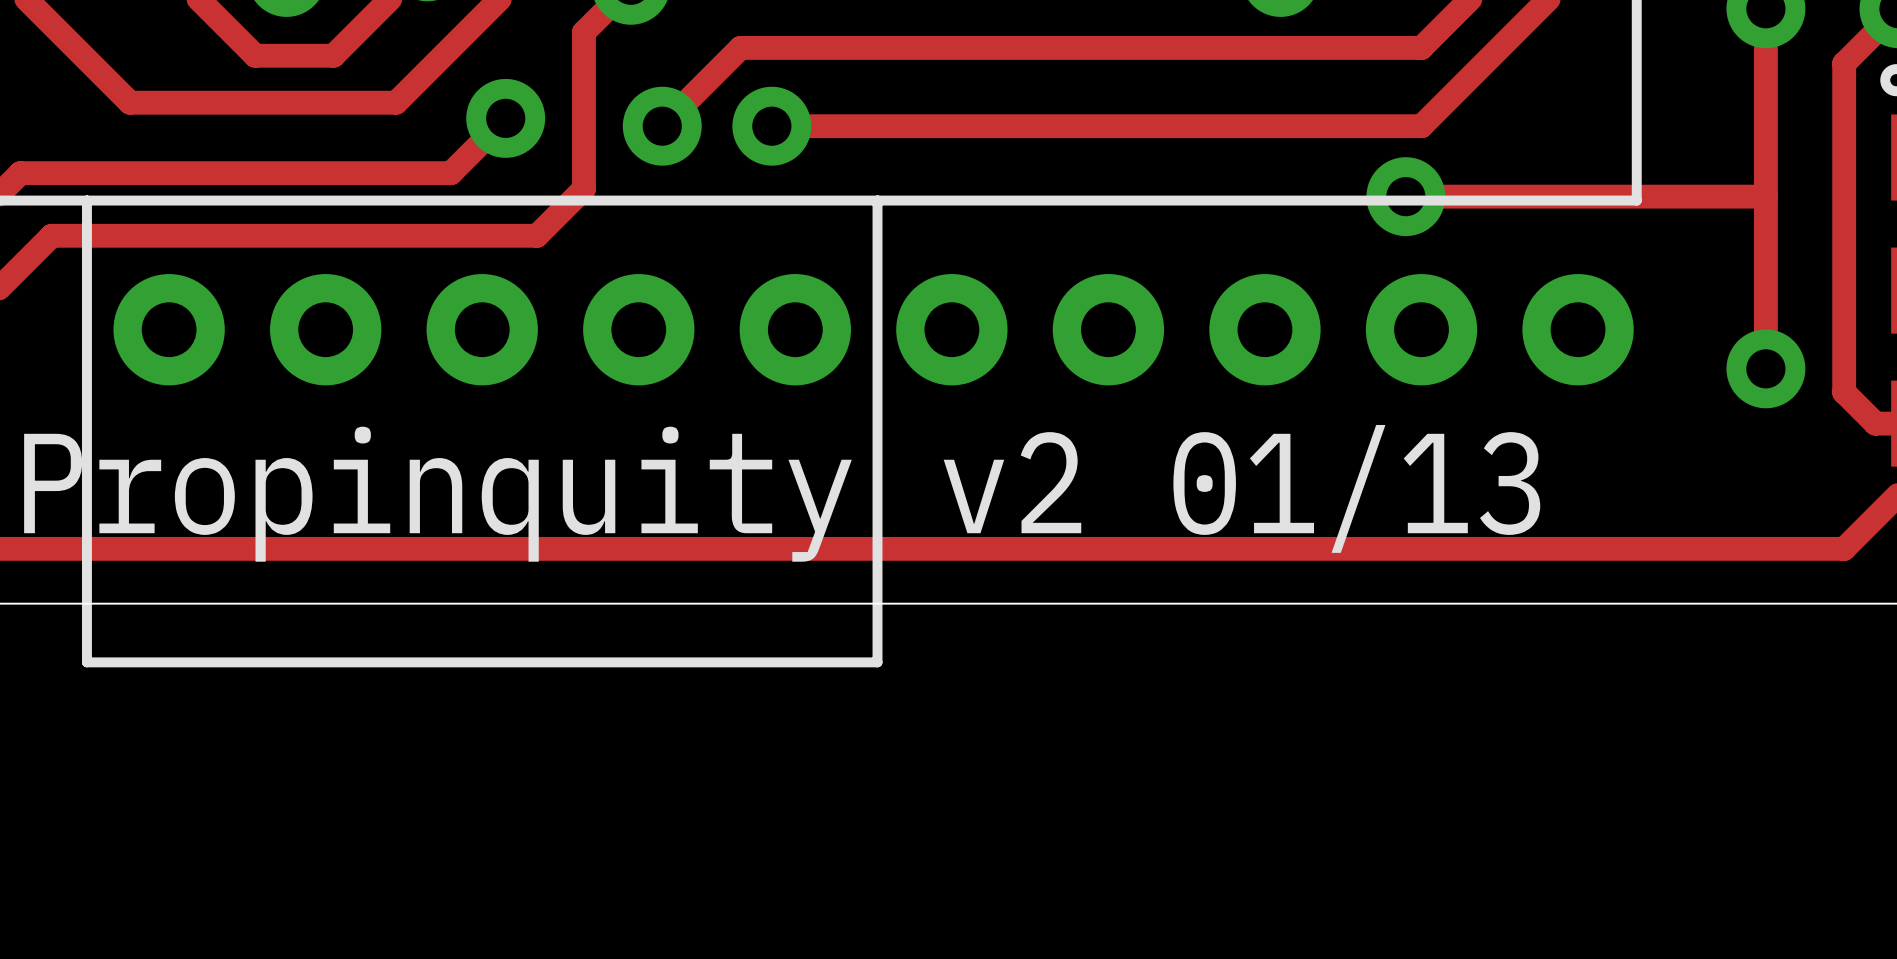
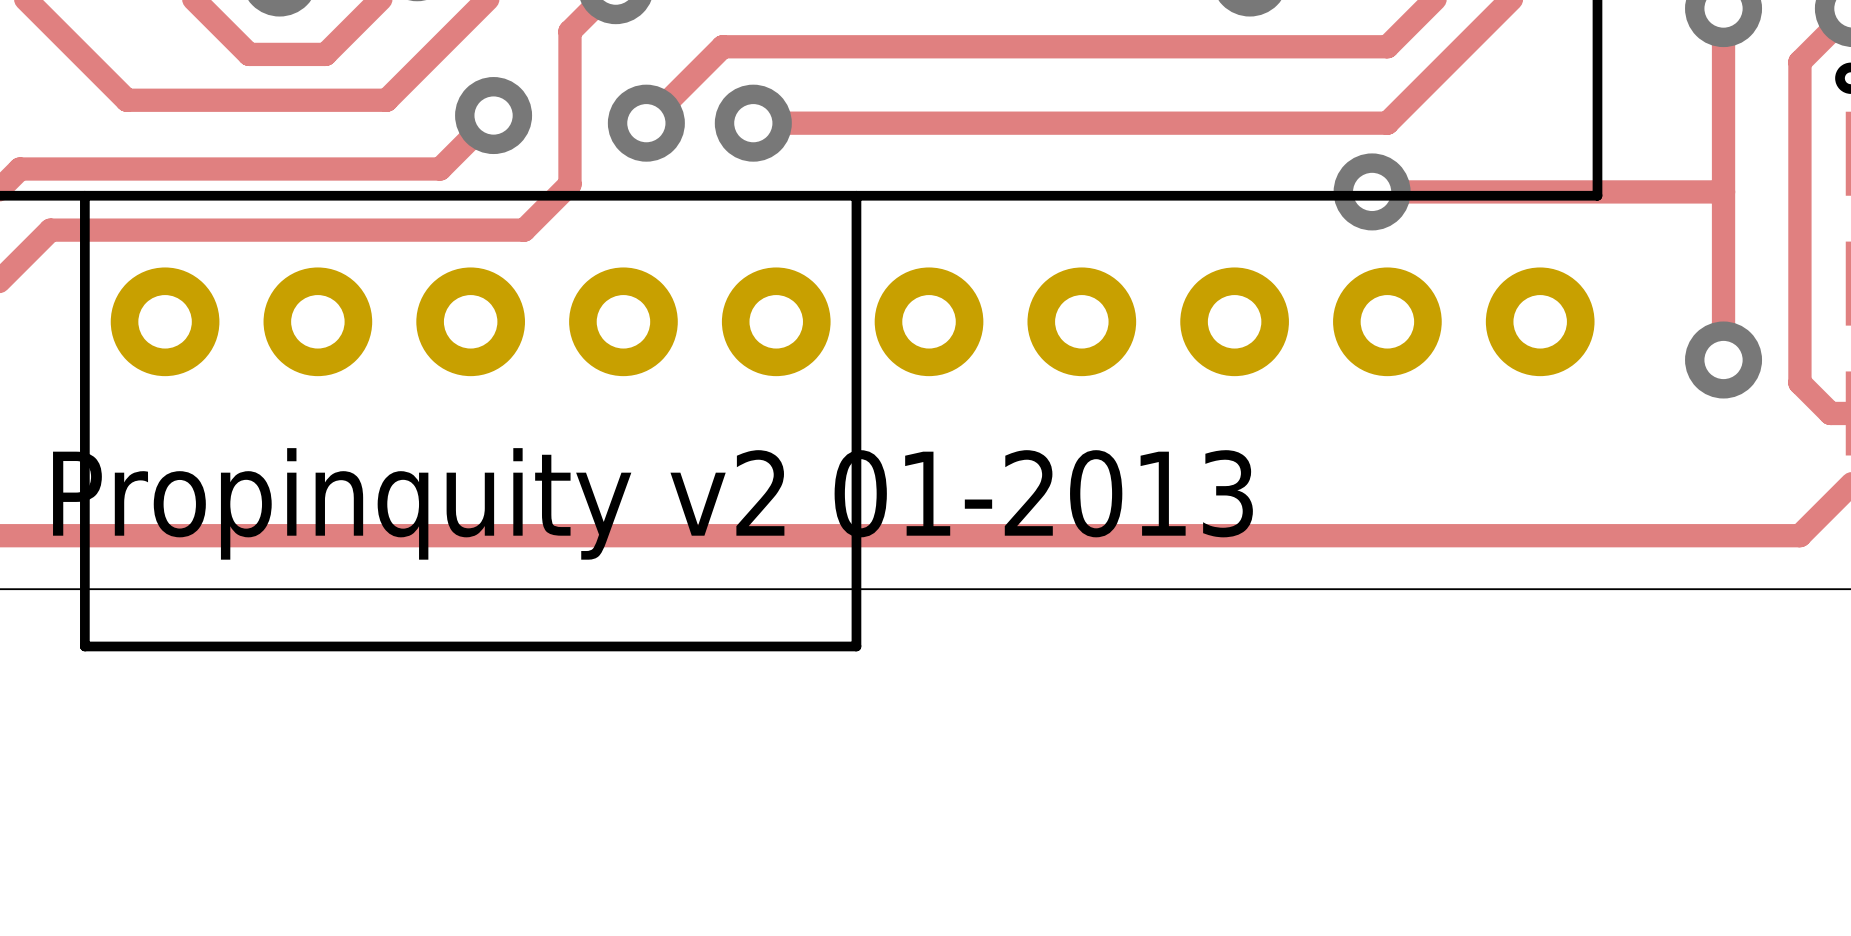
text: Propinquity v2 01/13 (782, 493) -> Propinquity v2 01-2013 (652, 503)

